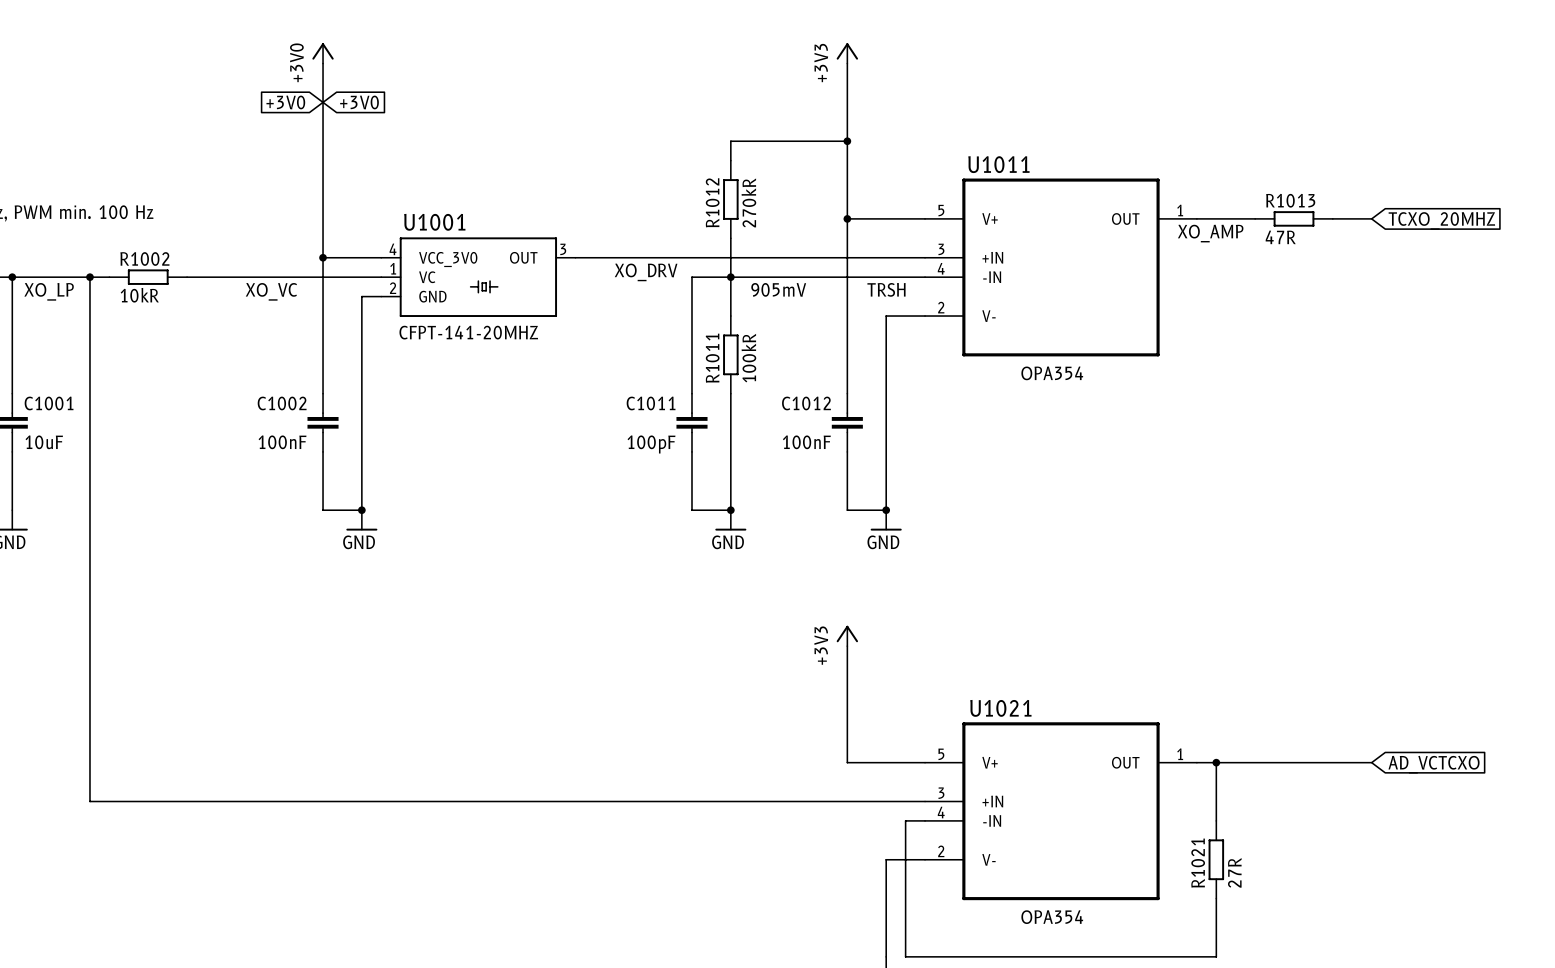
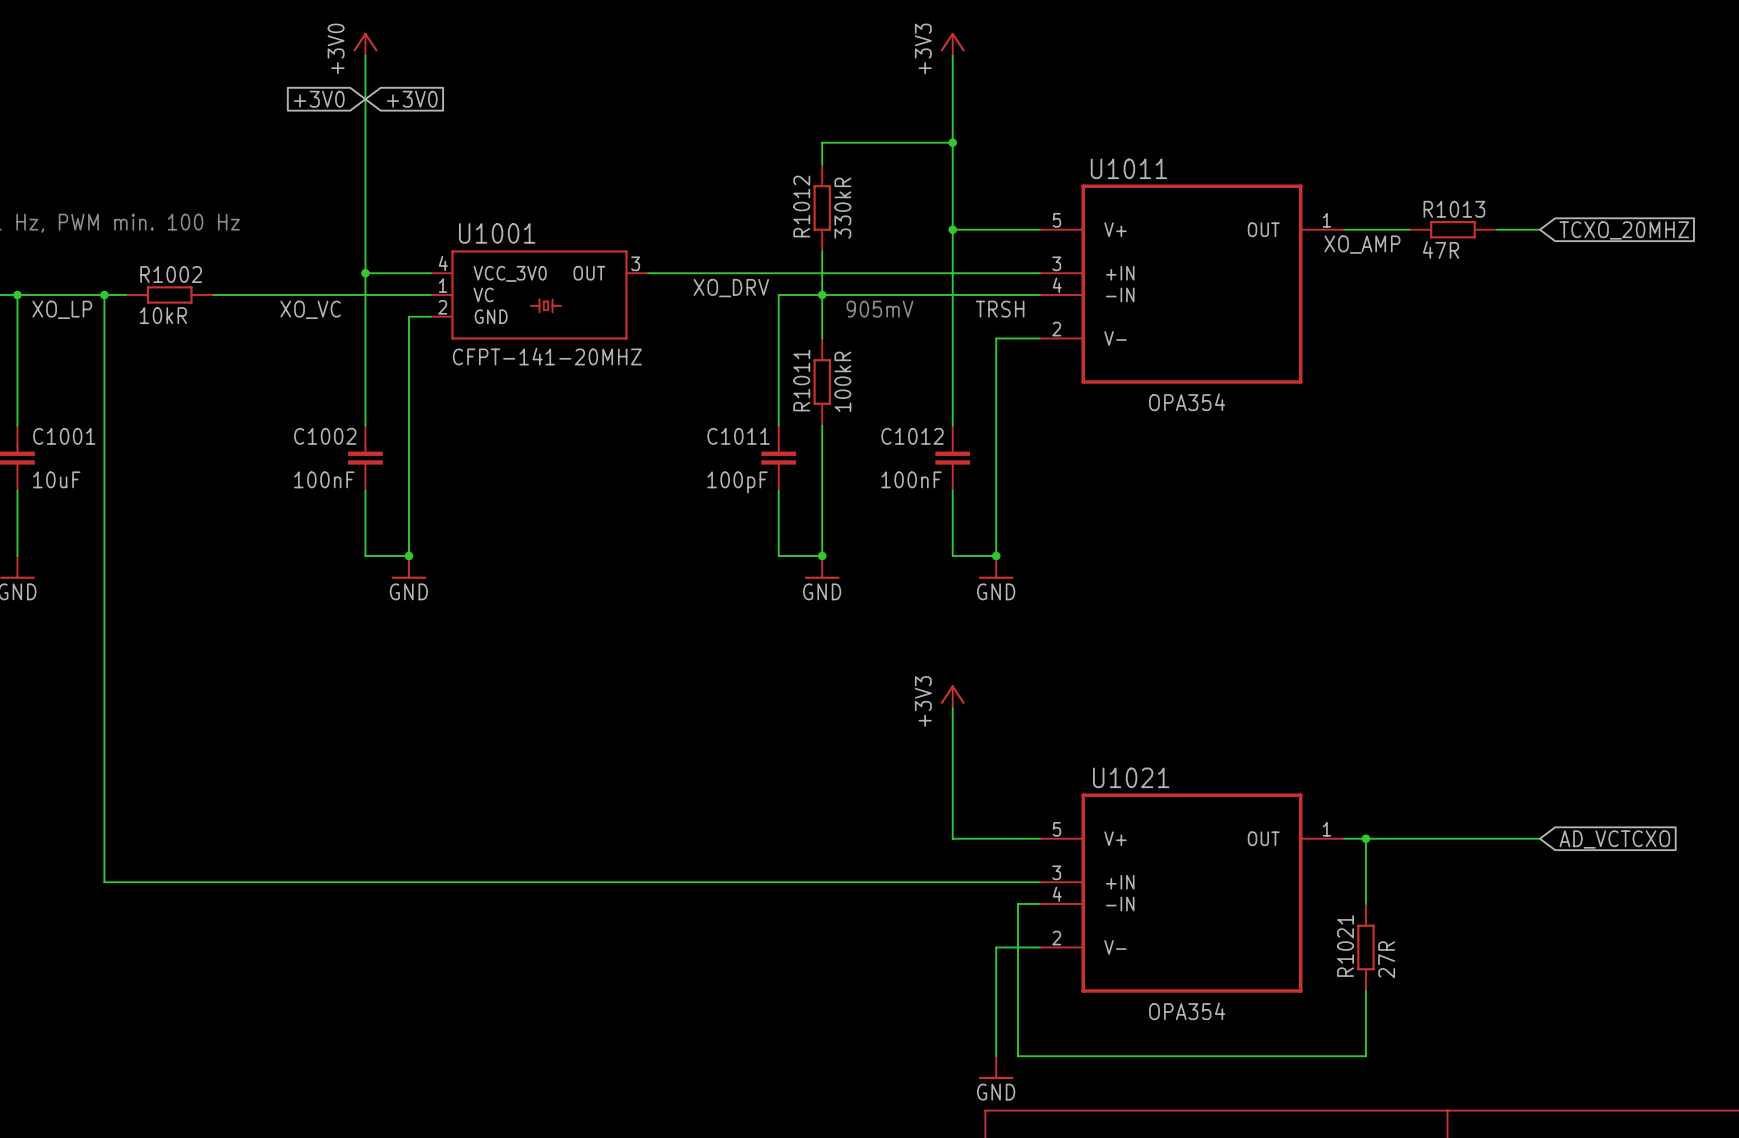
R1012 value: 270kR (748, 202) -> 330kR (842, 208)

